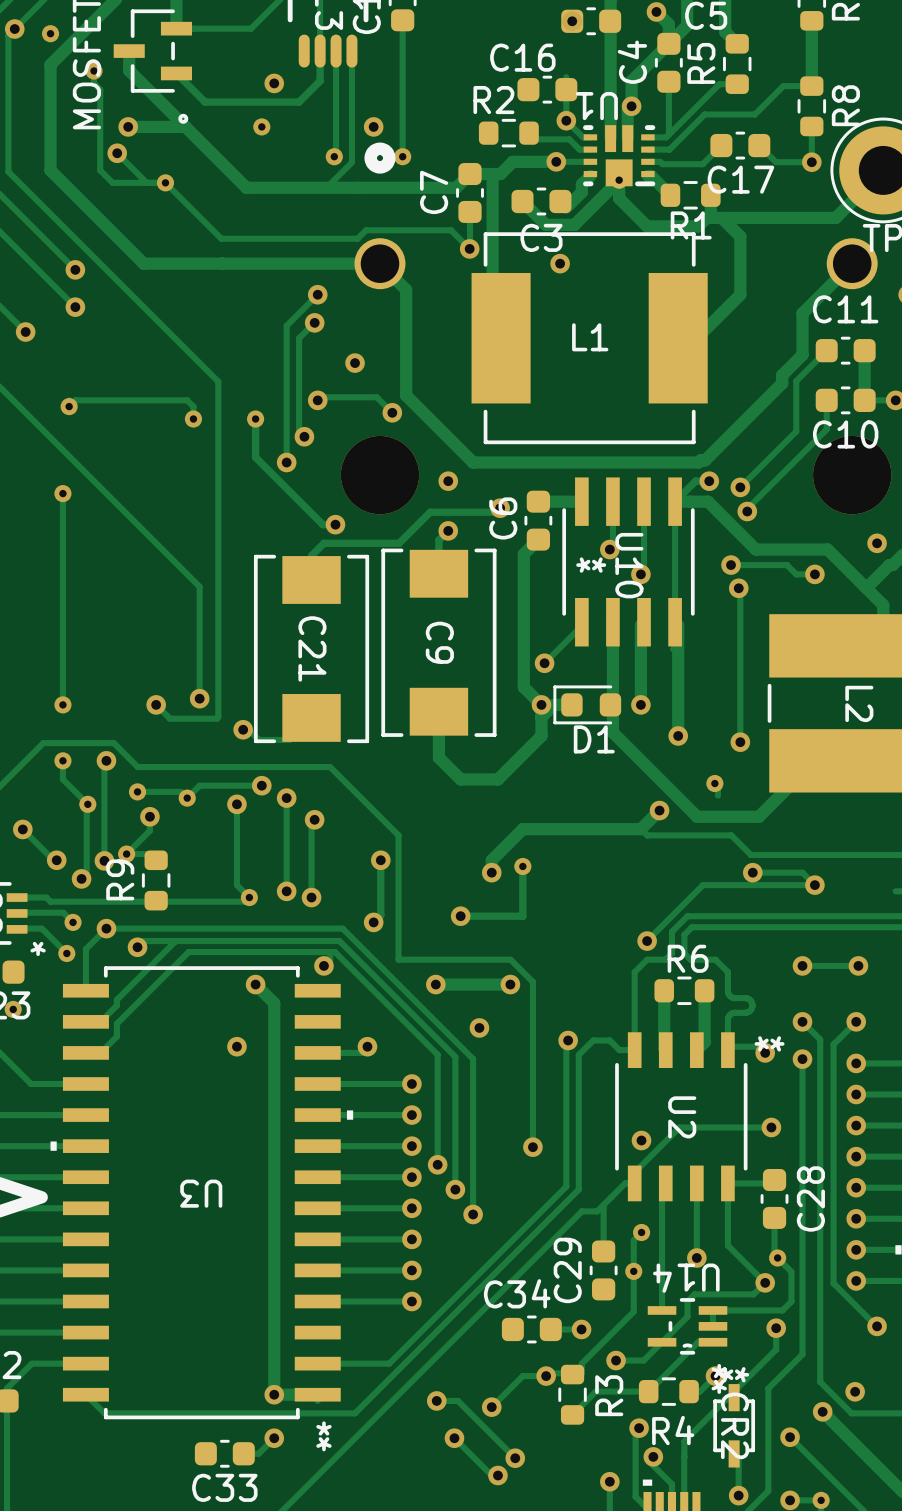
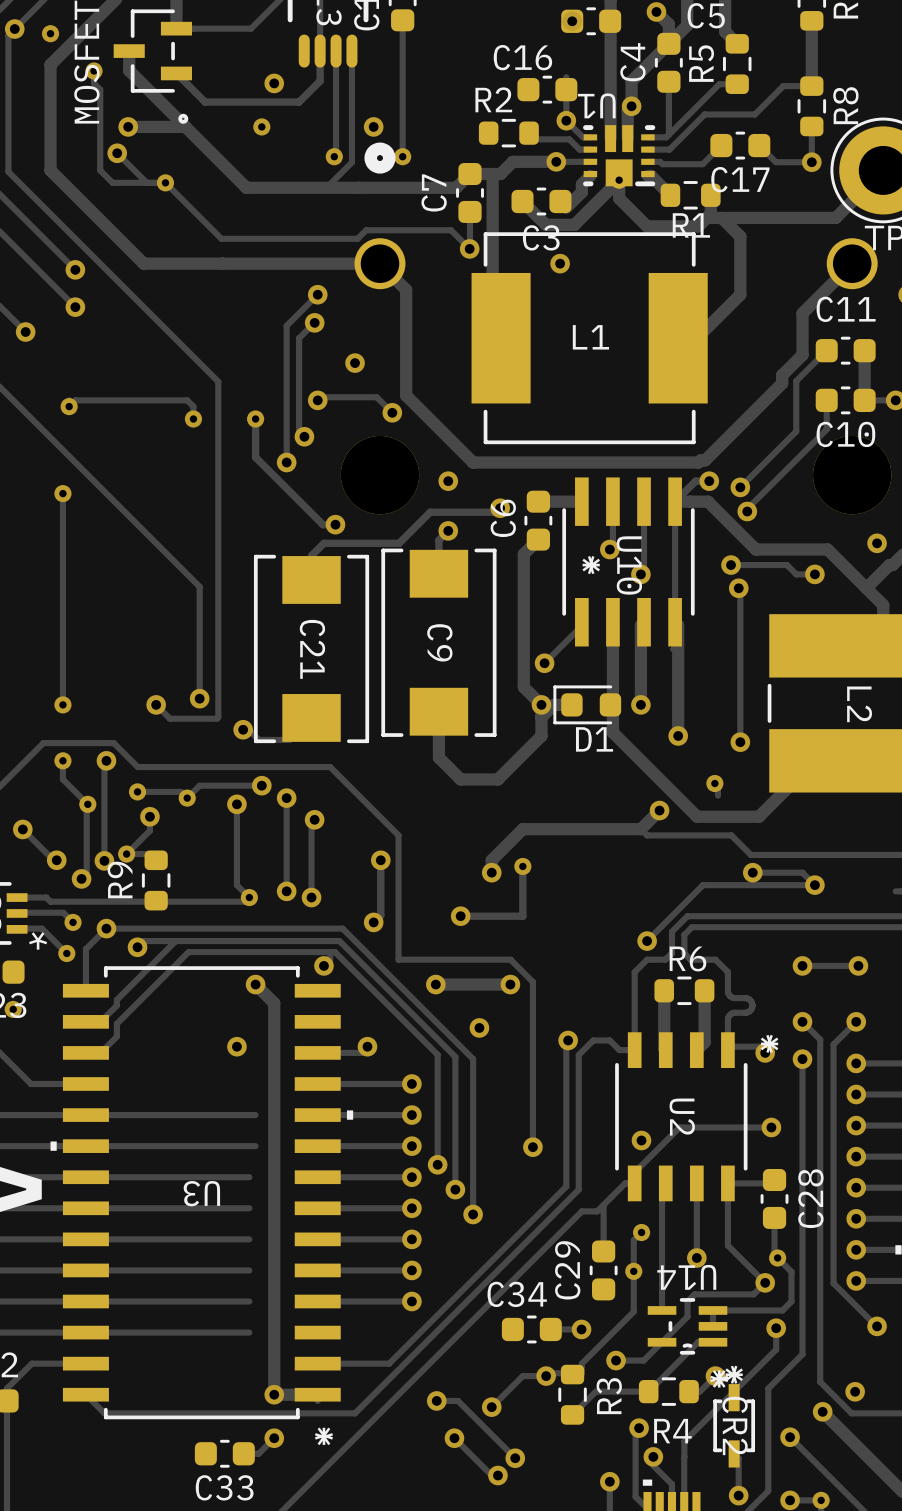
track: none -> (94, 1115) (255, 1115)
track: none -> (94, 1146) (255, 1146)
track: none -> (94, 1177) (249, 1177)
track: none -> (94, 1208) (249, 1208)
track: none -> (94, 1239) (249, 1239)
track: none -> (94, 1270) (249, 1270)
track: none -> (94, 1301) (249, 1301)
track: none -> (94, 1332) (249, 1332)

